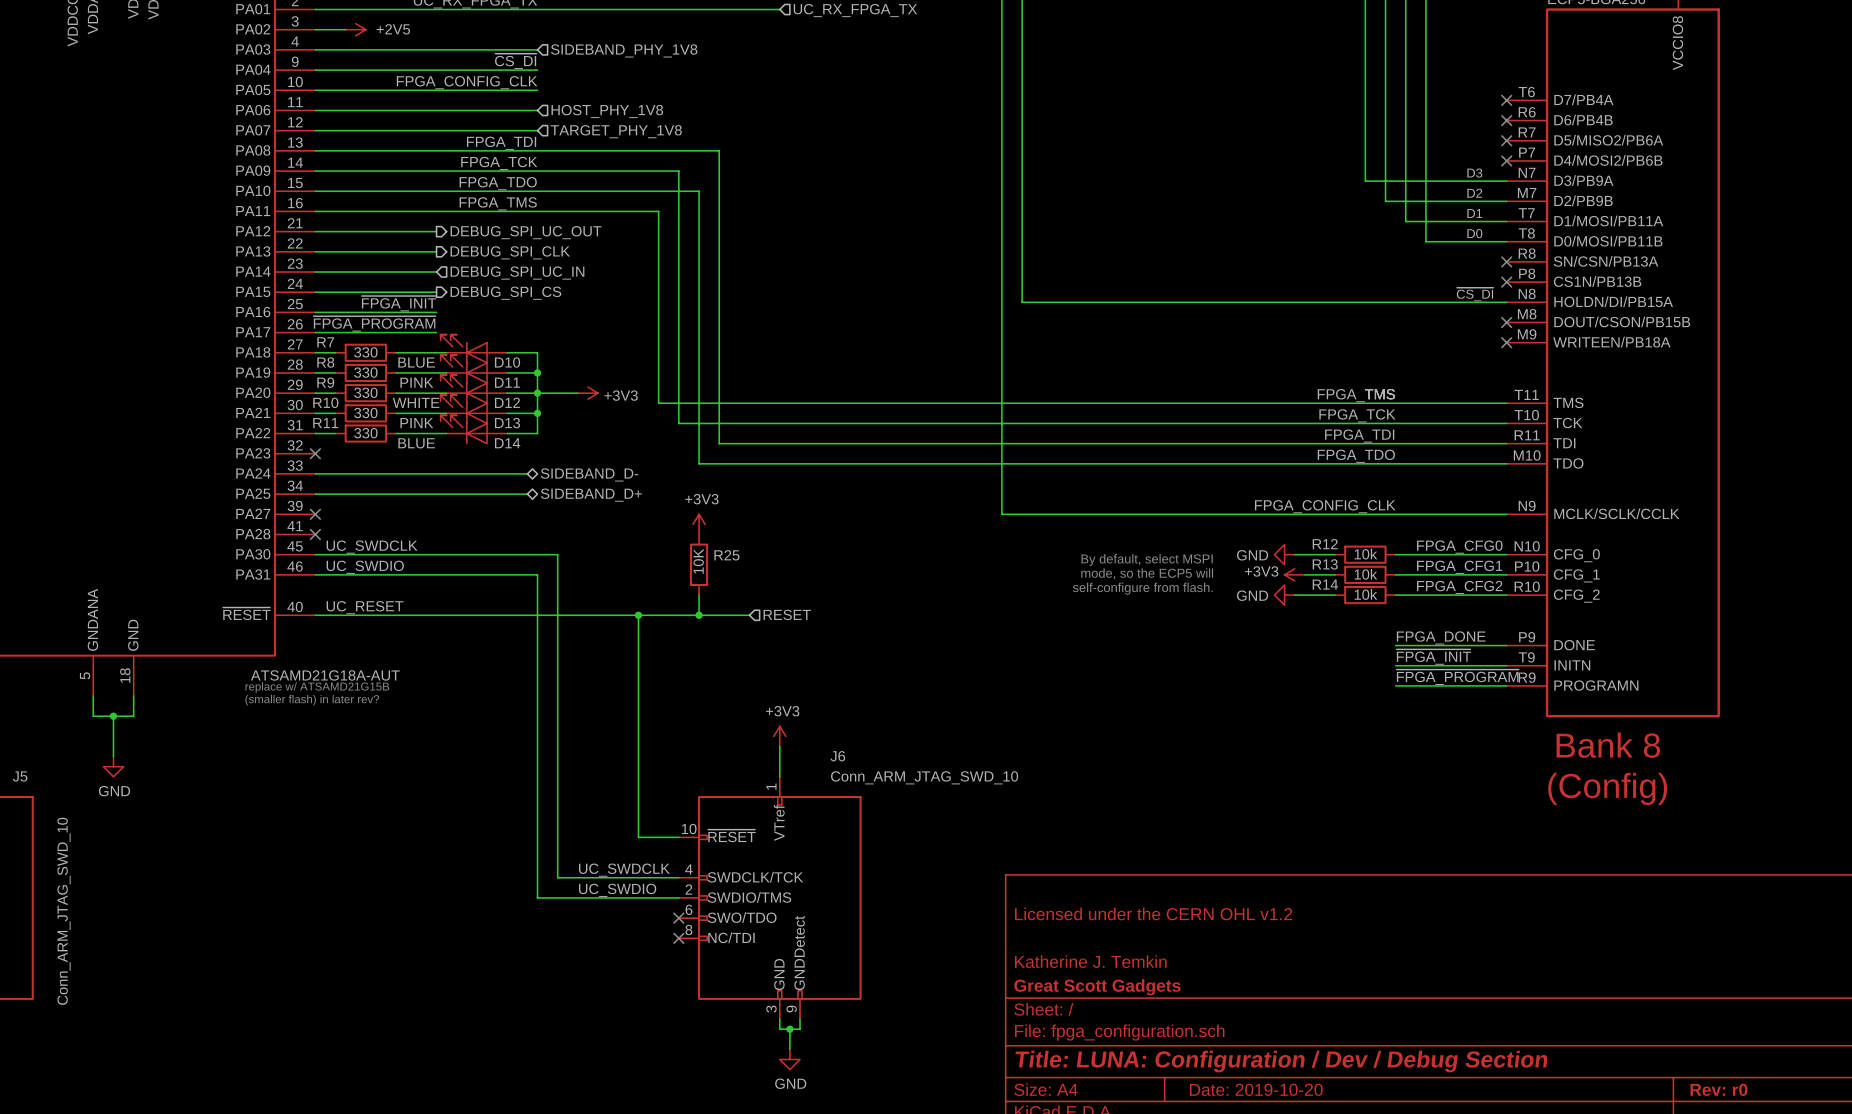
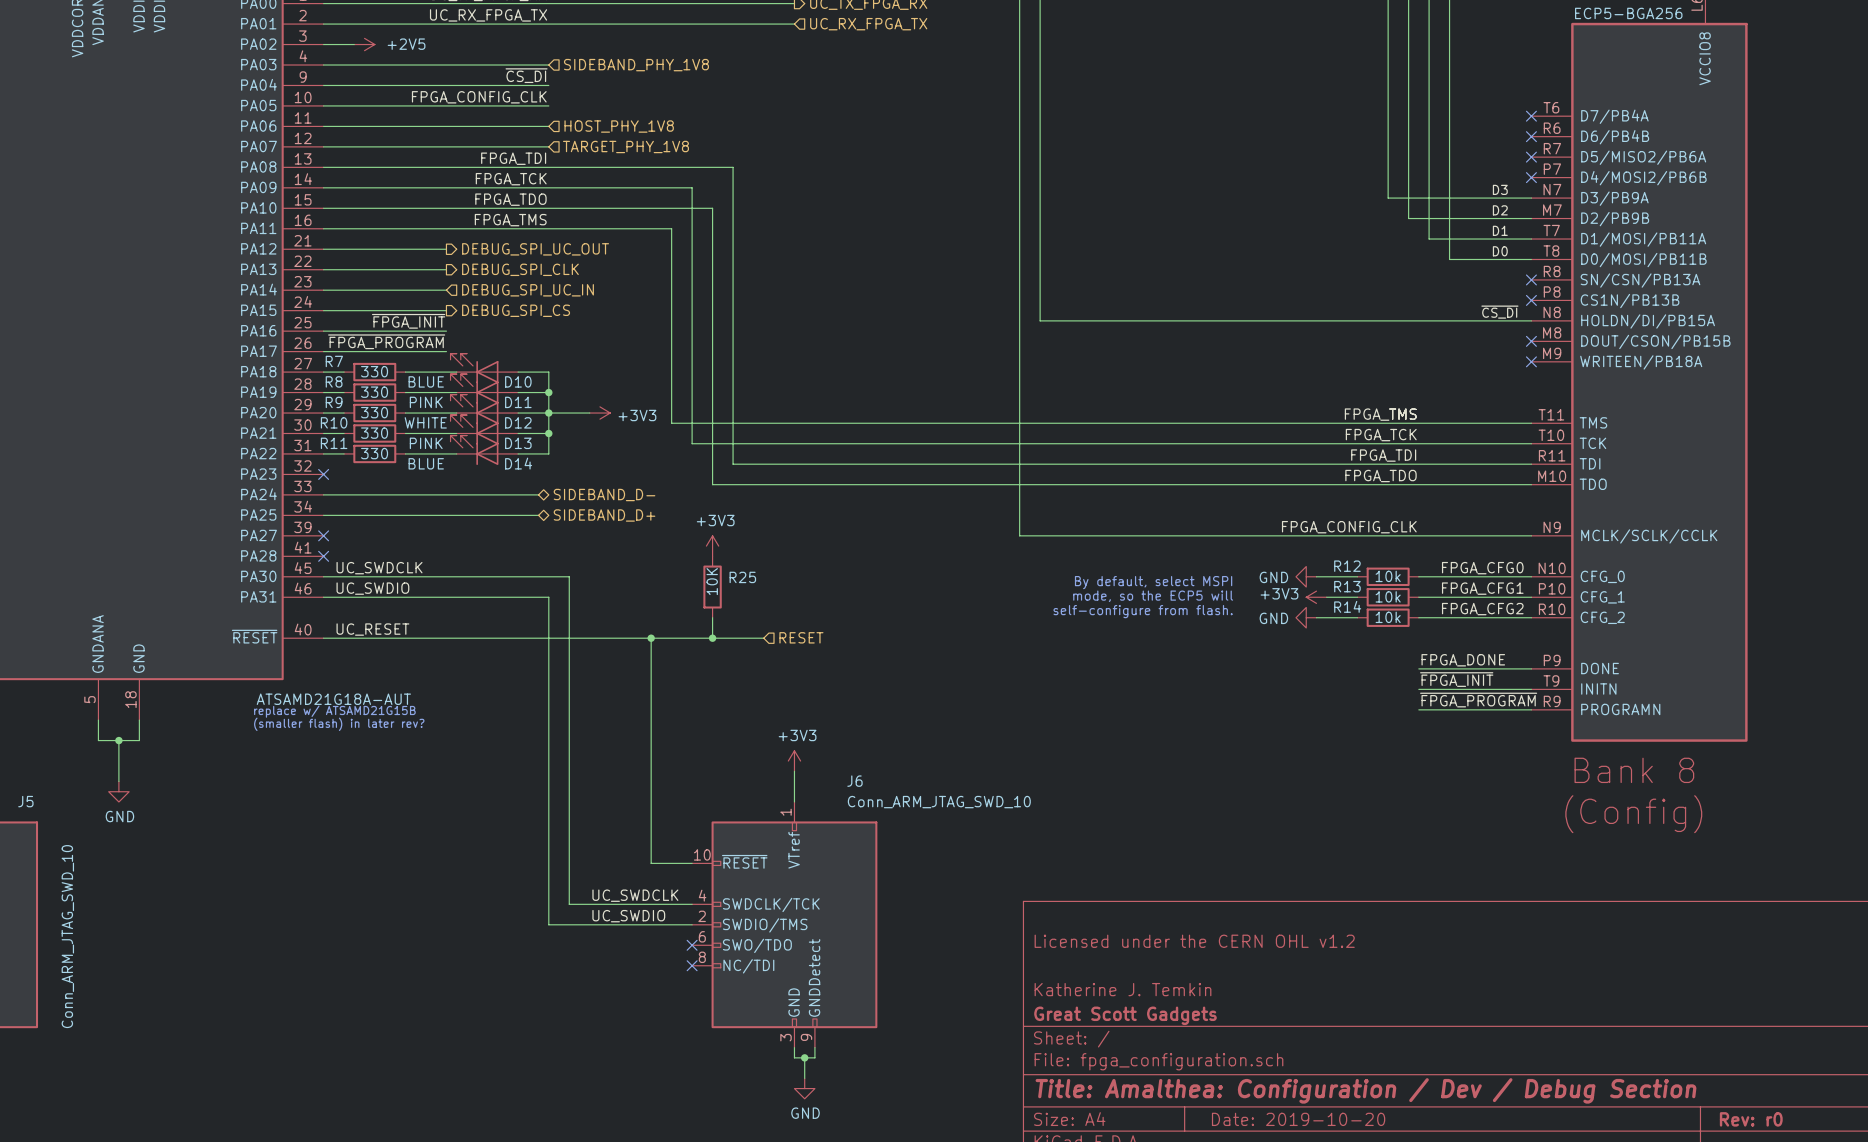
title block: Title: LUNA: Configuration / Dev / Debug Section (1281, 1061) -> Title: Amalthea: Configuration / Dev / Debug Section (1366, 1090)

